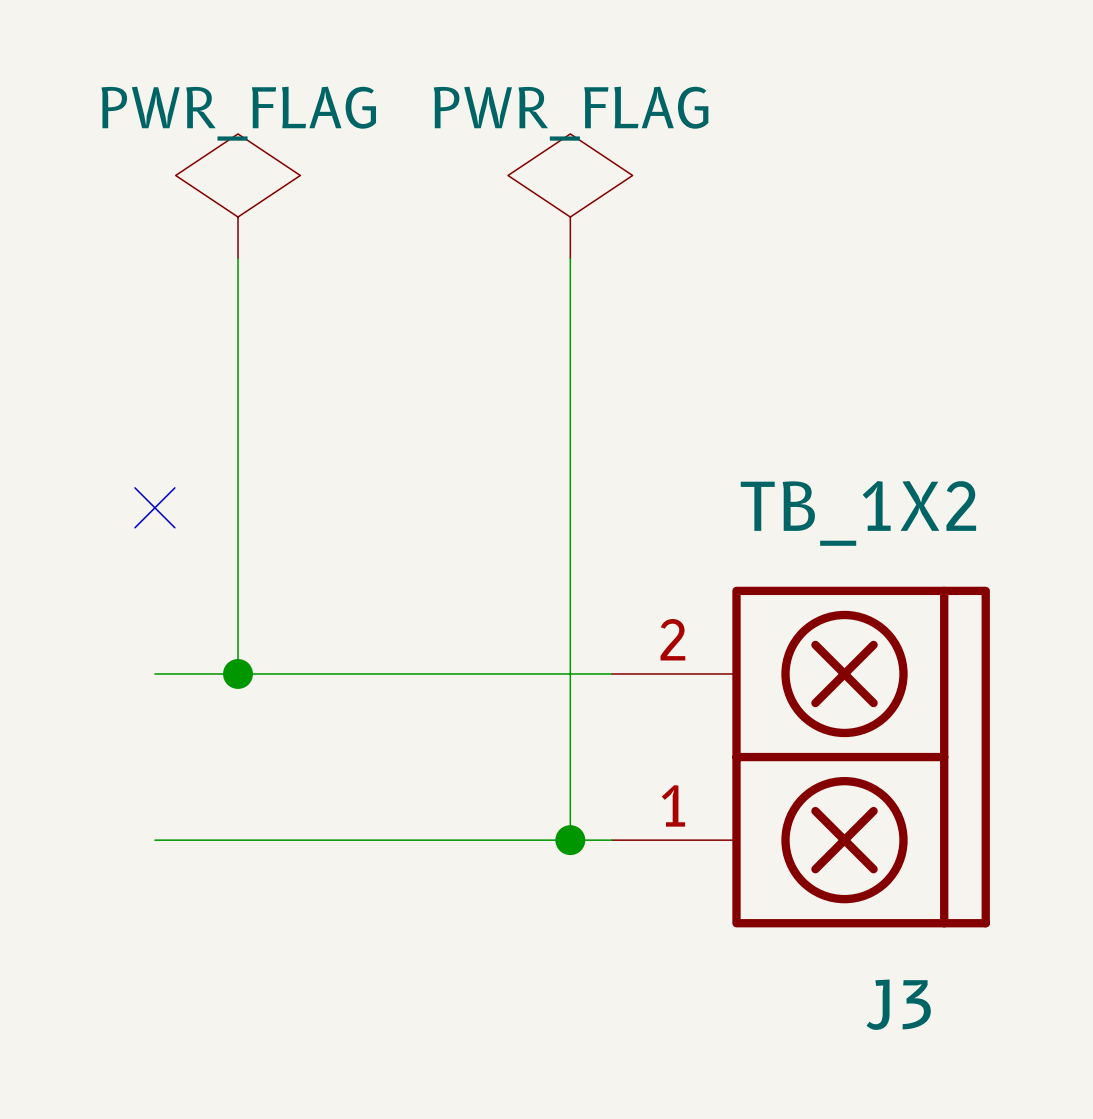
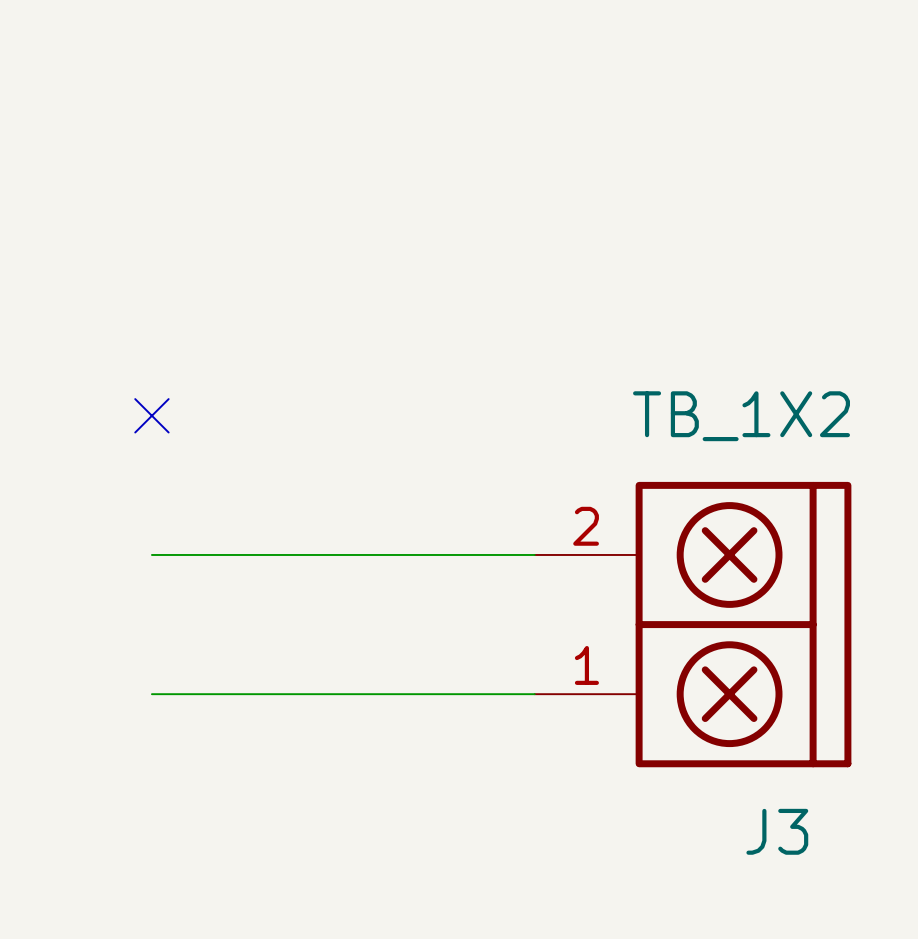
power symbol: PWR_FLAG (238, 196) -> none
power symbol: PWR_FLAG (570, 196) -> none
wire: (238, 258) (238, 673) -> none
wire: (570, 258) (570, 840) -> none
junction: (238, 673) -> none
junction: (570, 840) -> none

